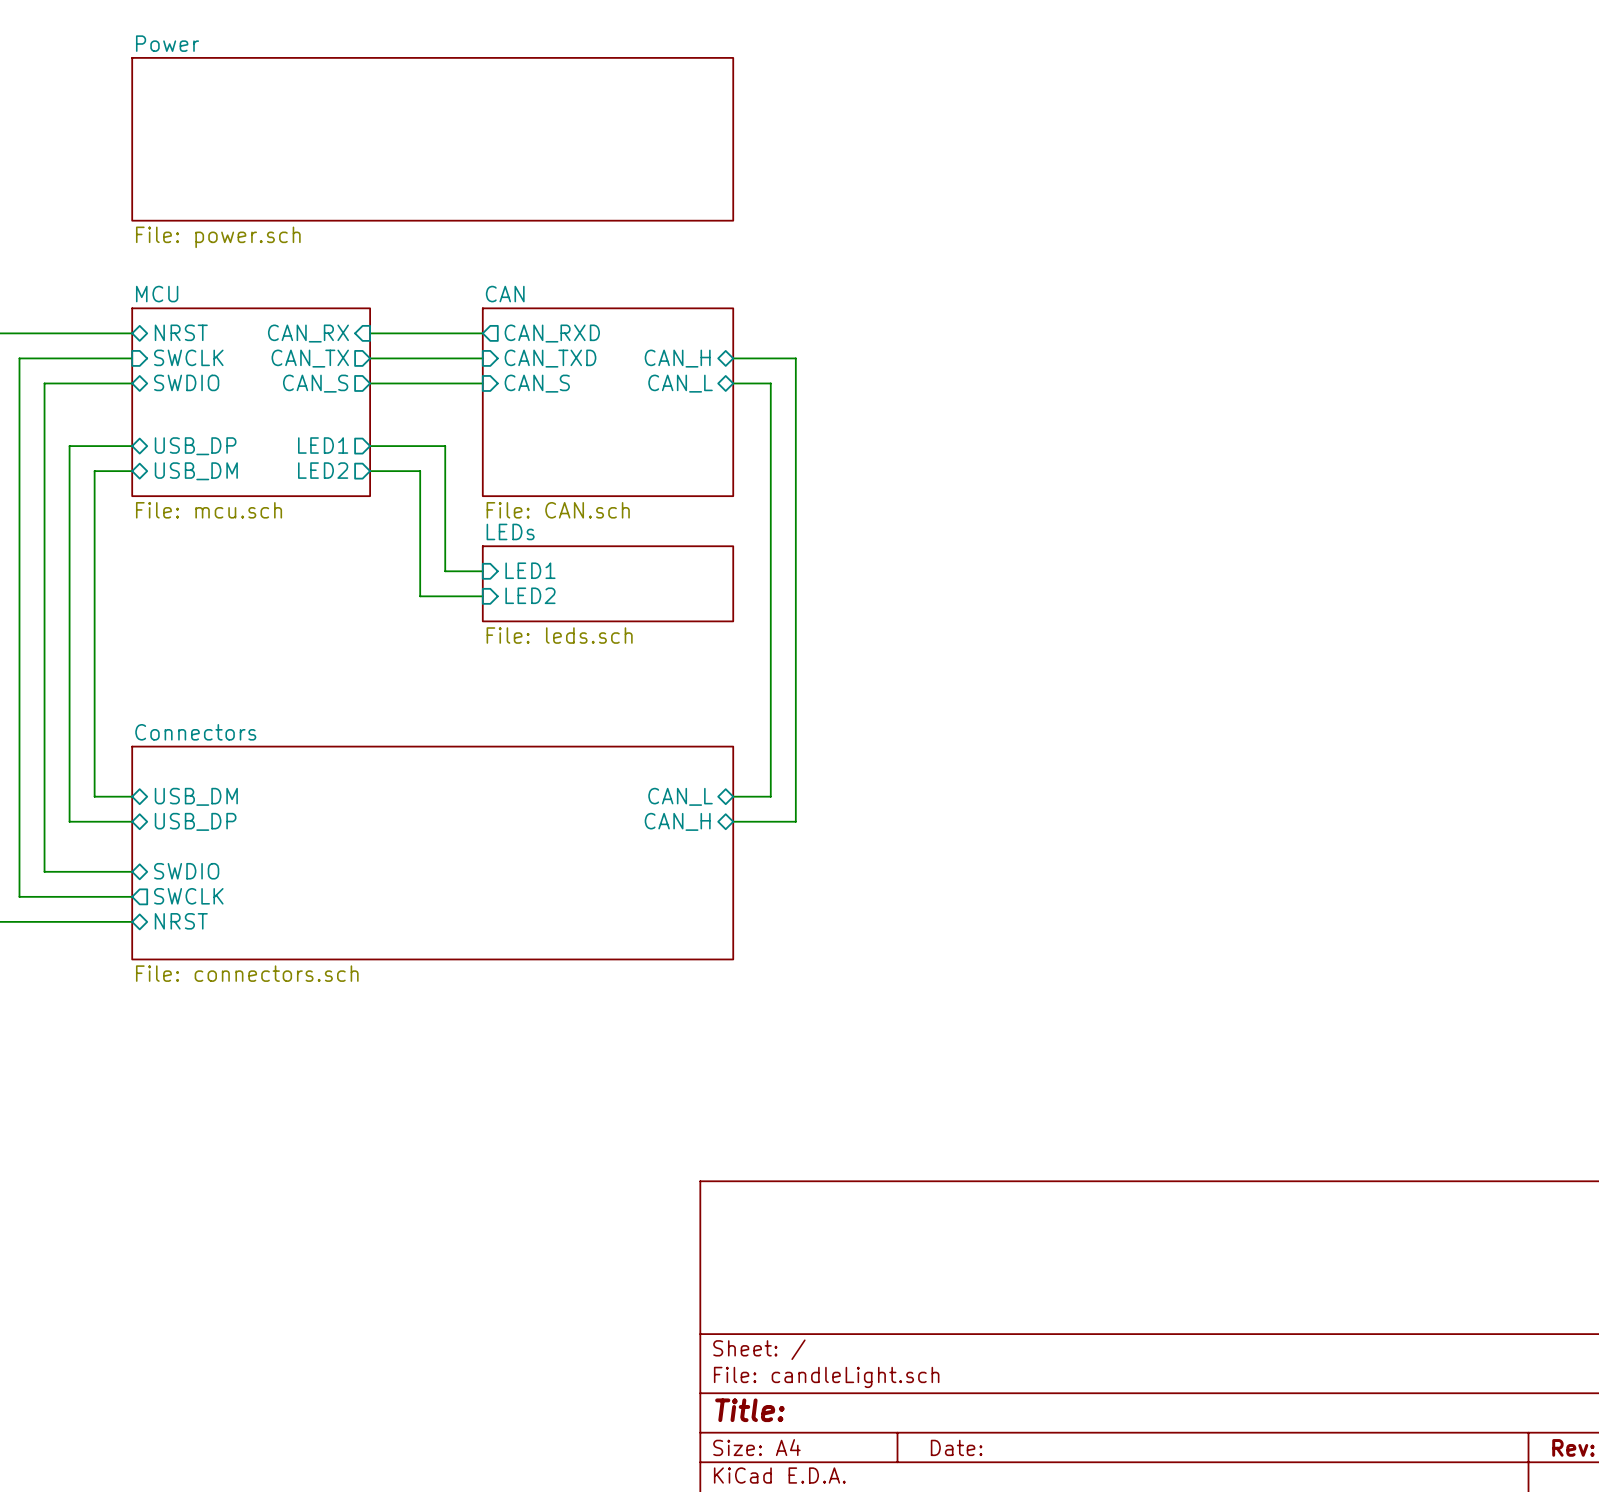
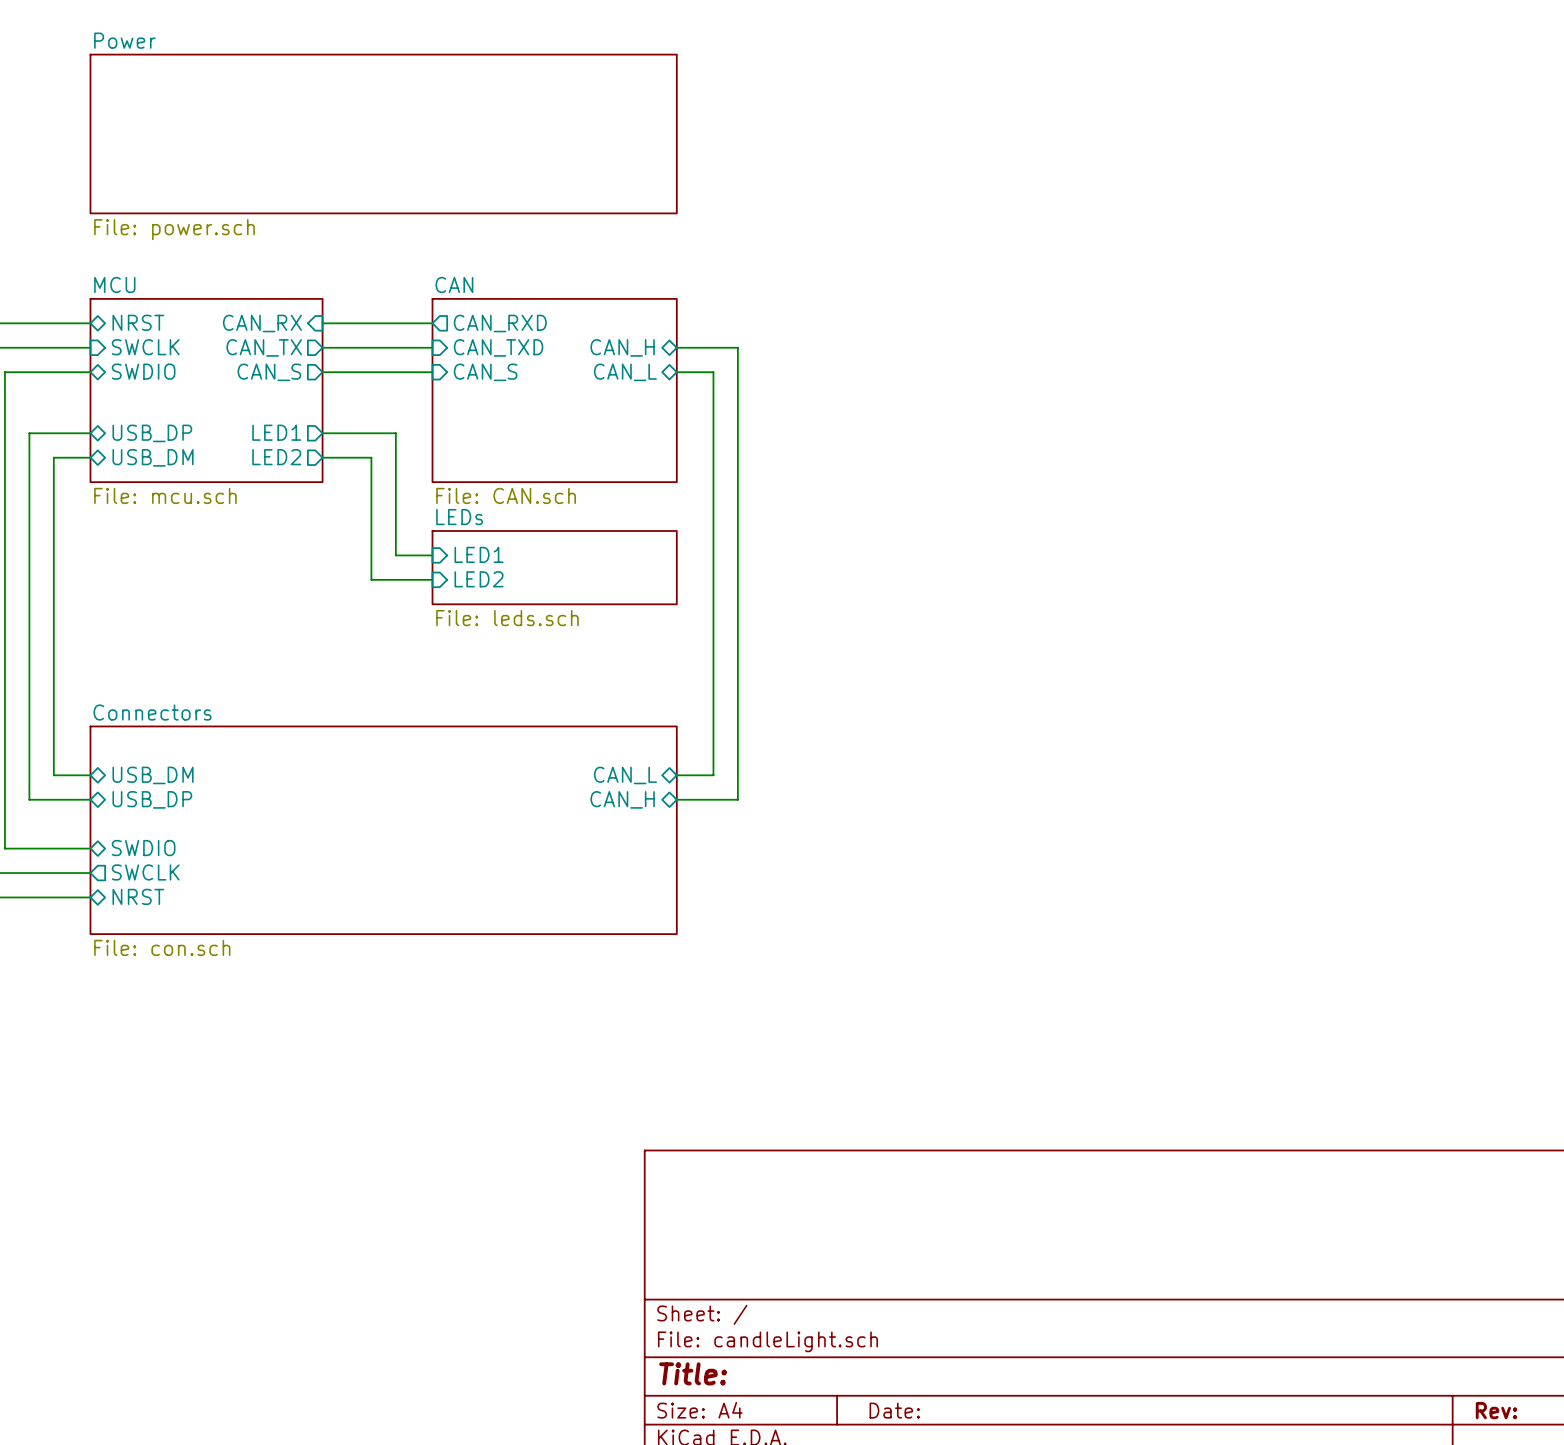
sheet Connectors value: File: connectors.sch (247, 973) -> File: con.sch (162, 947)

